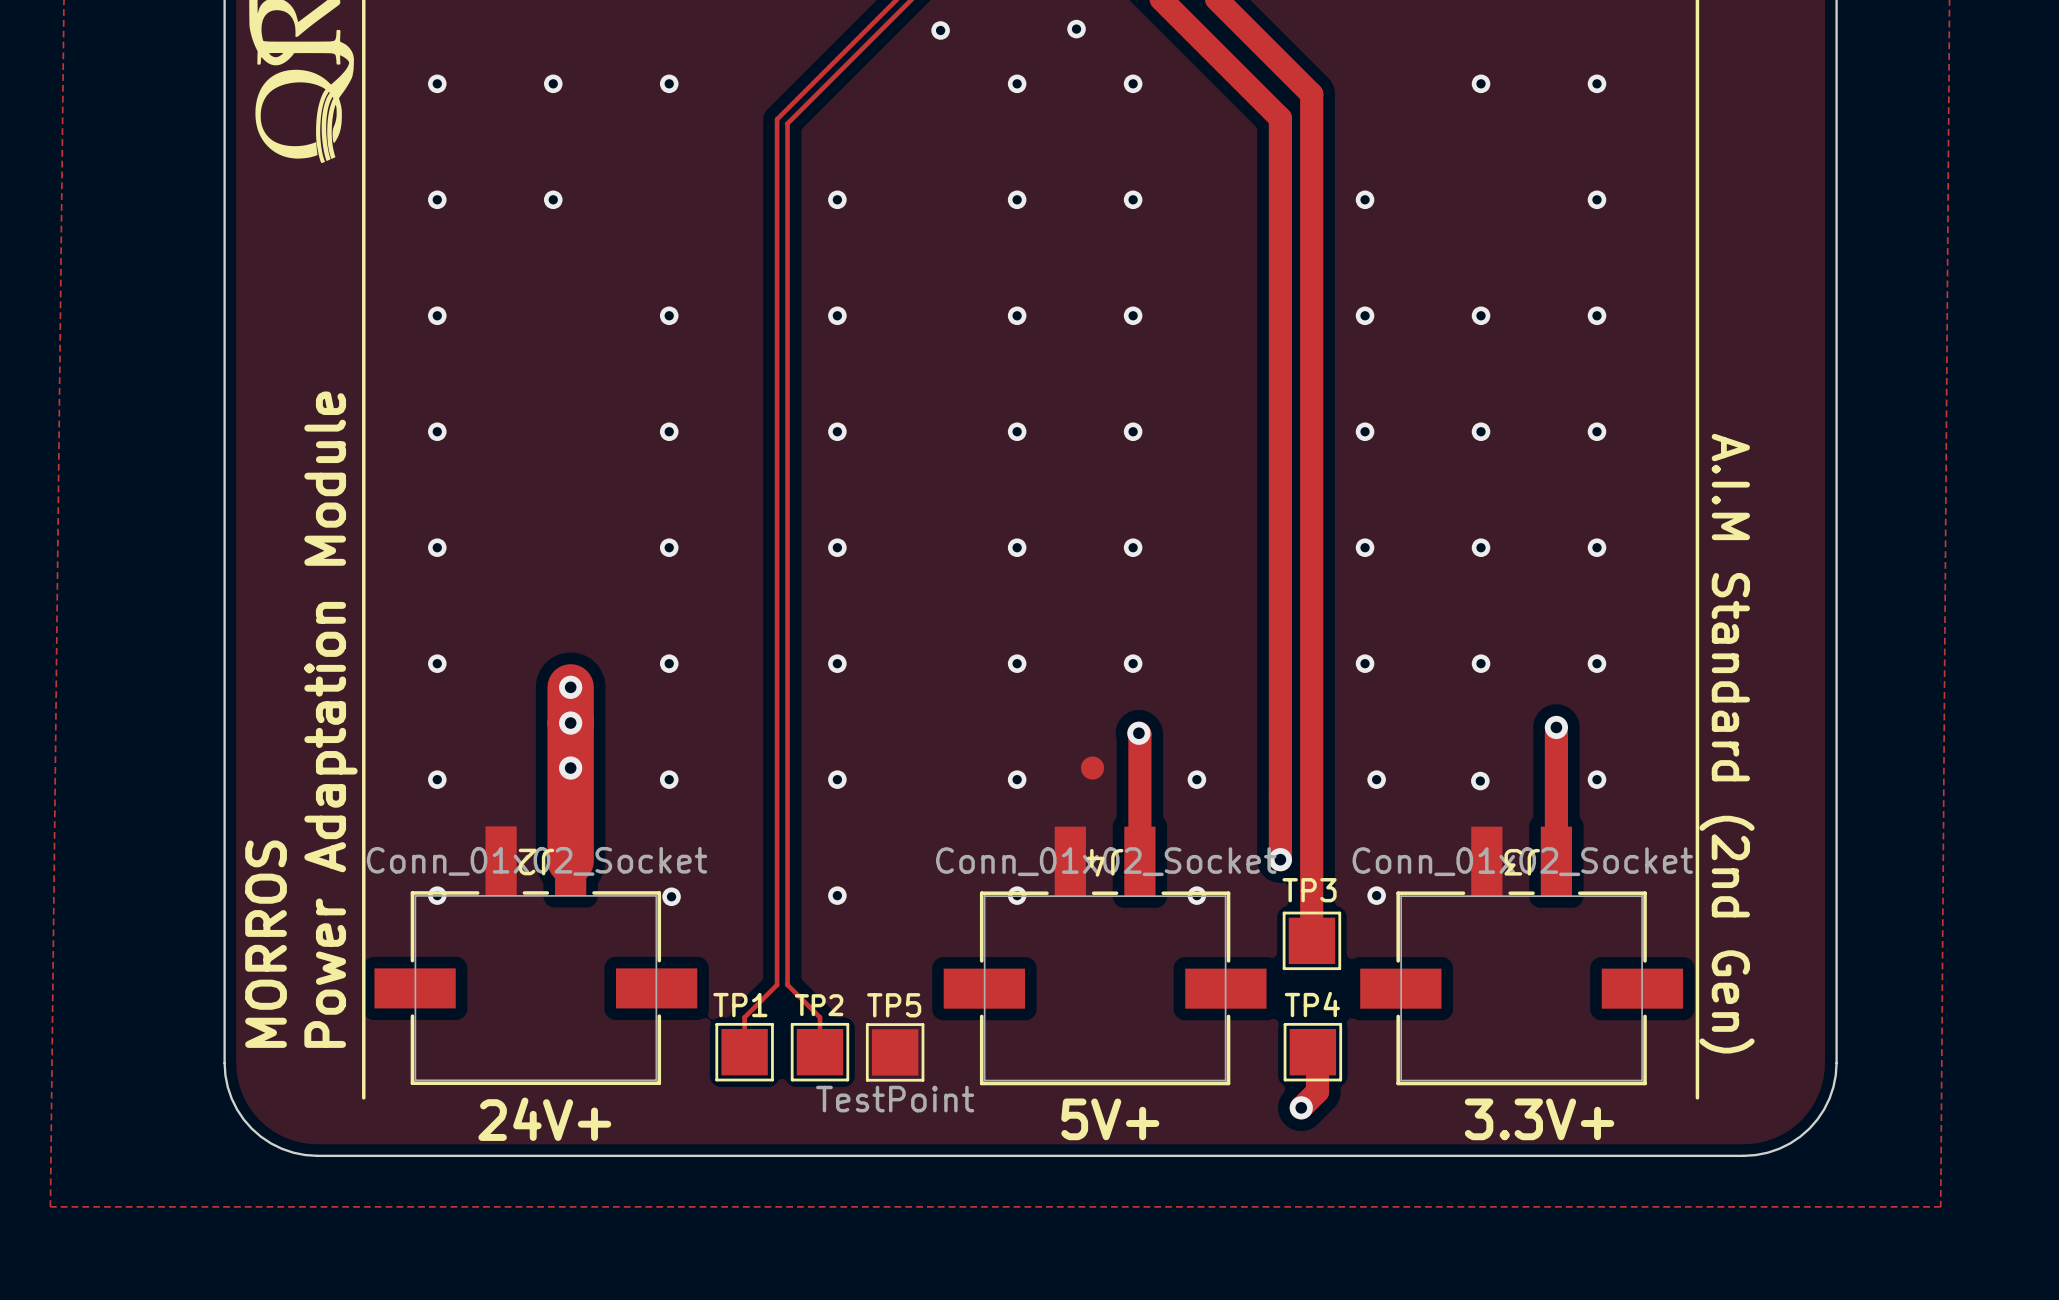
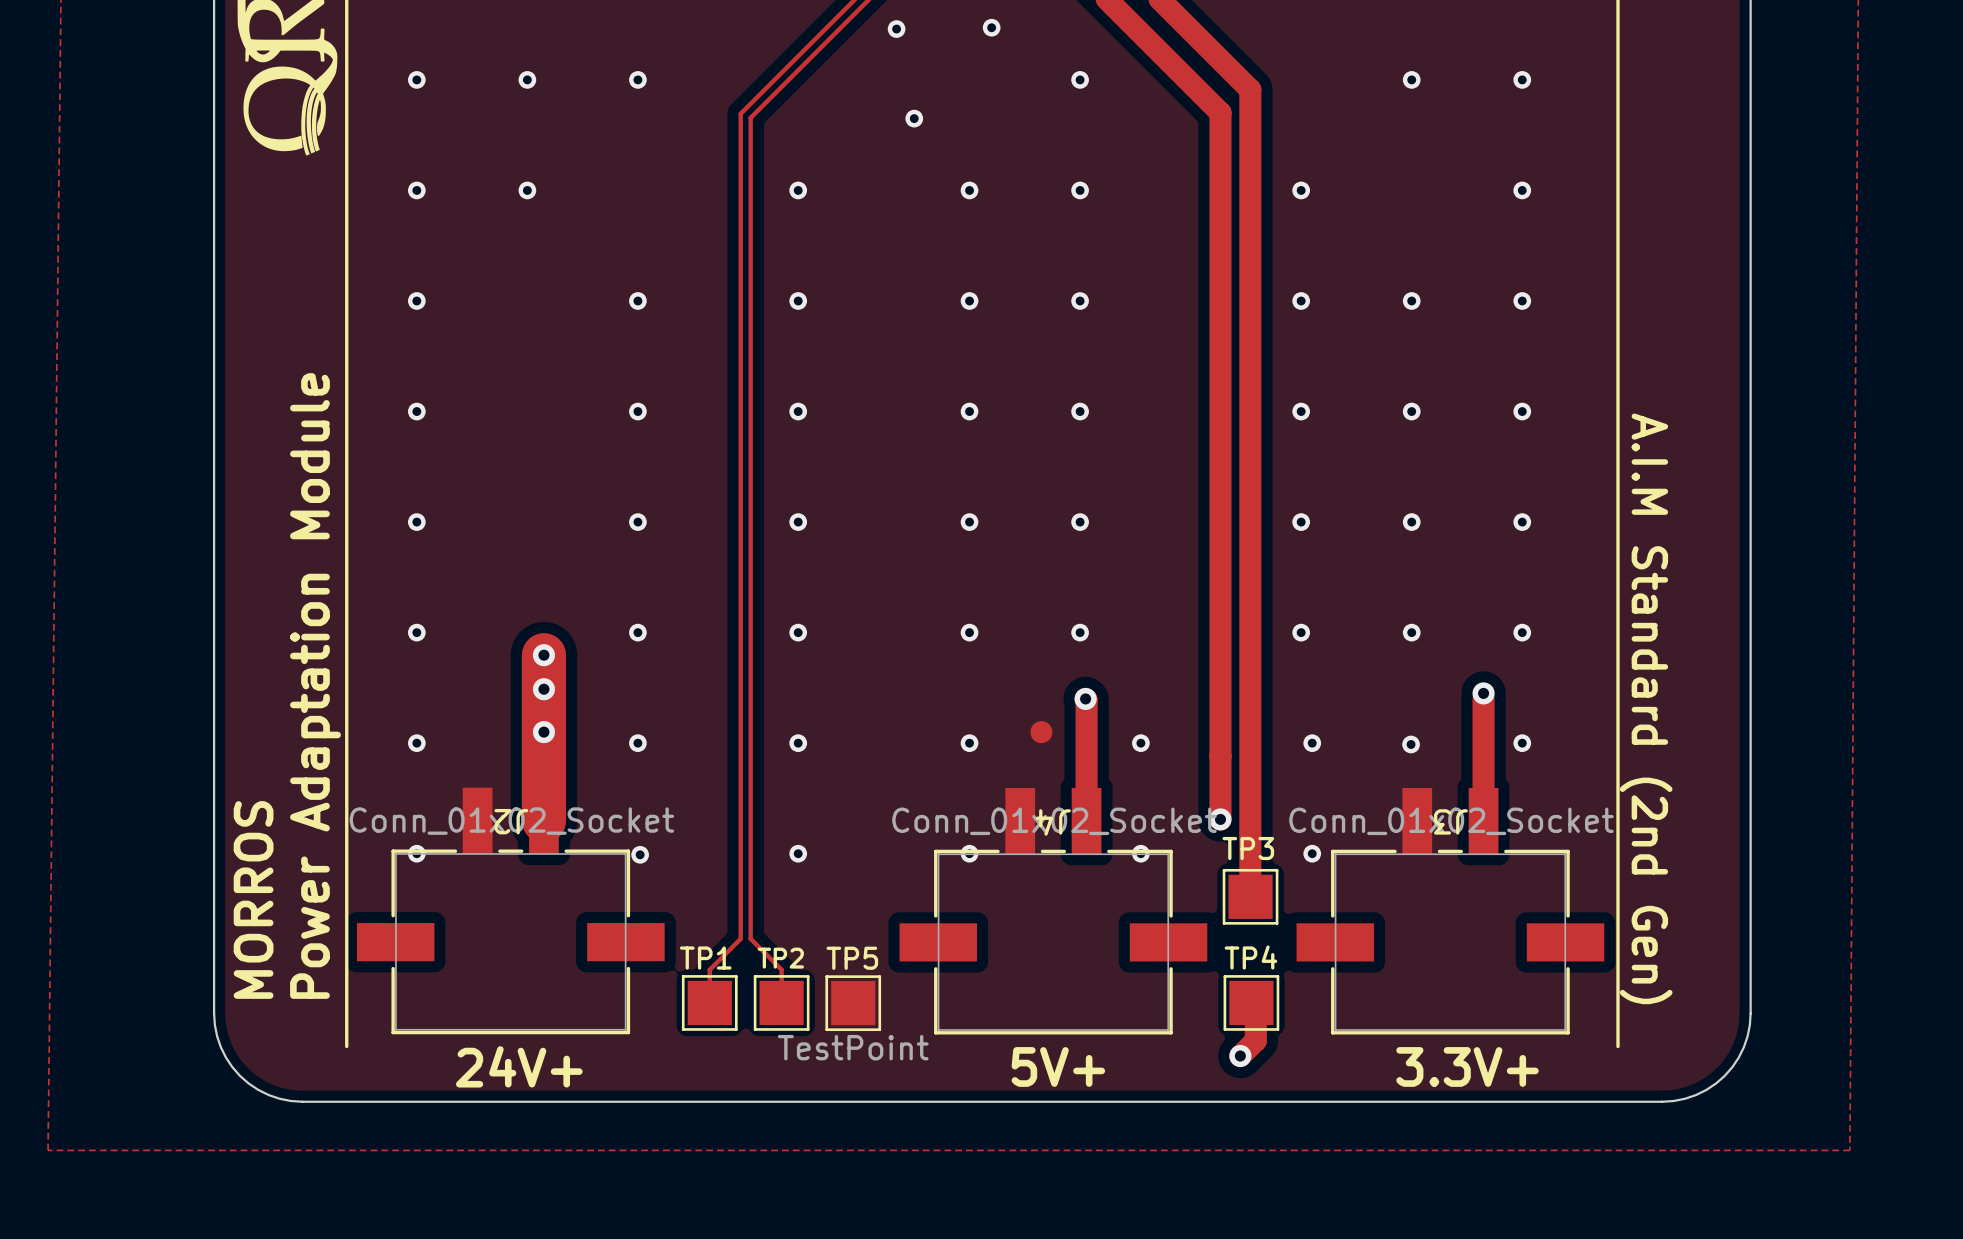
via: none -> (991, 27)
via: (1076, 29) -> none
via: (1017, 83) -> none
via: none -> (914, 118)

